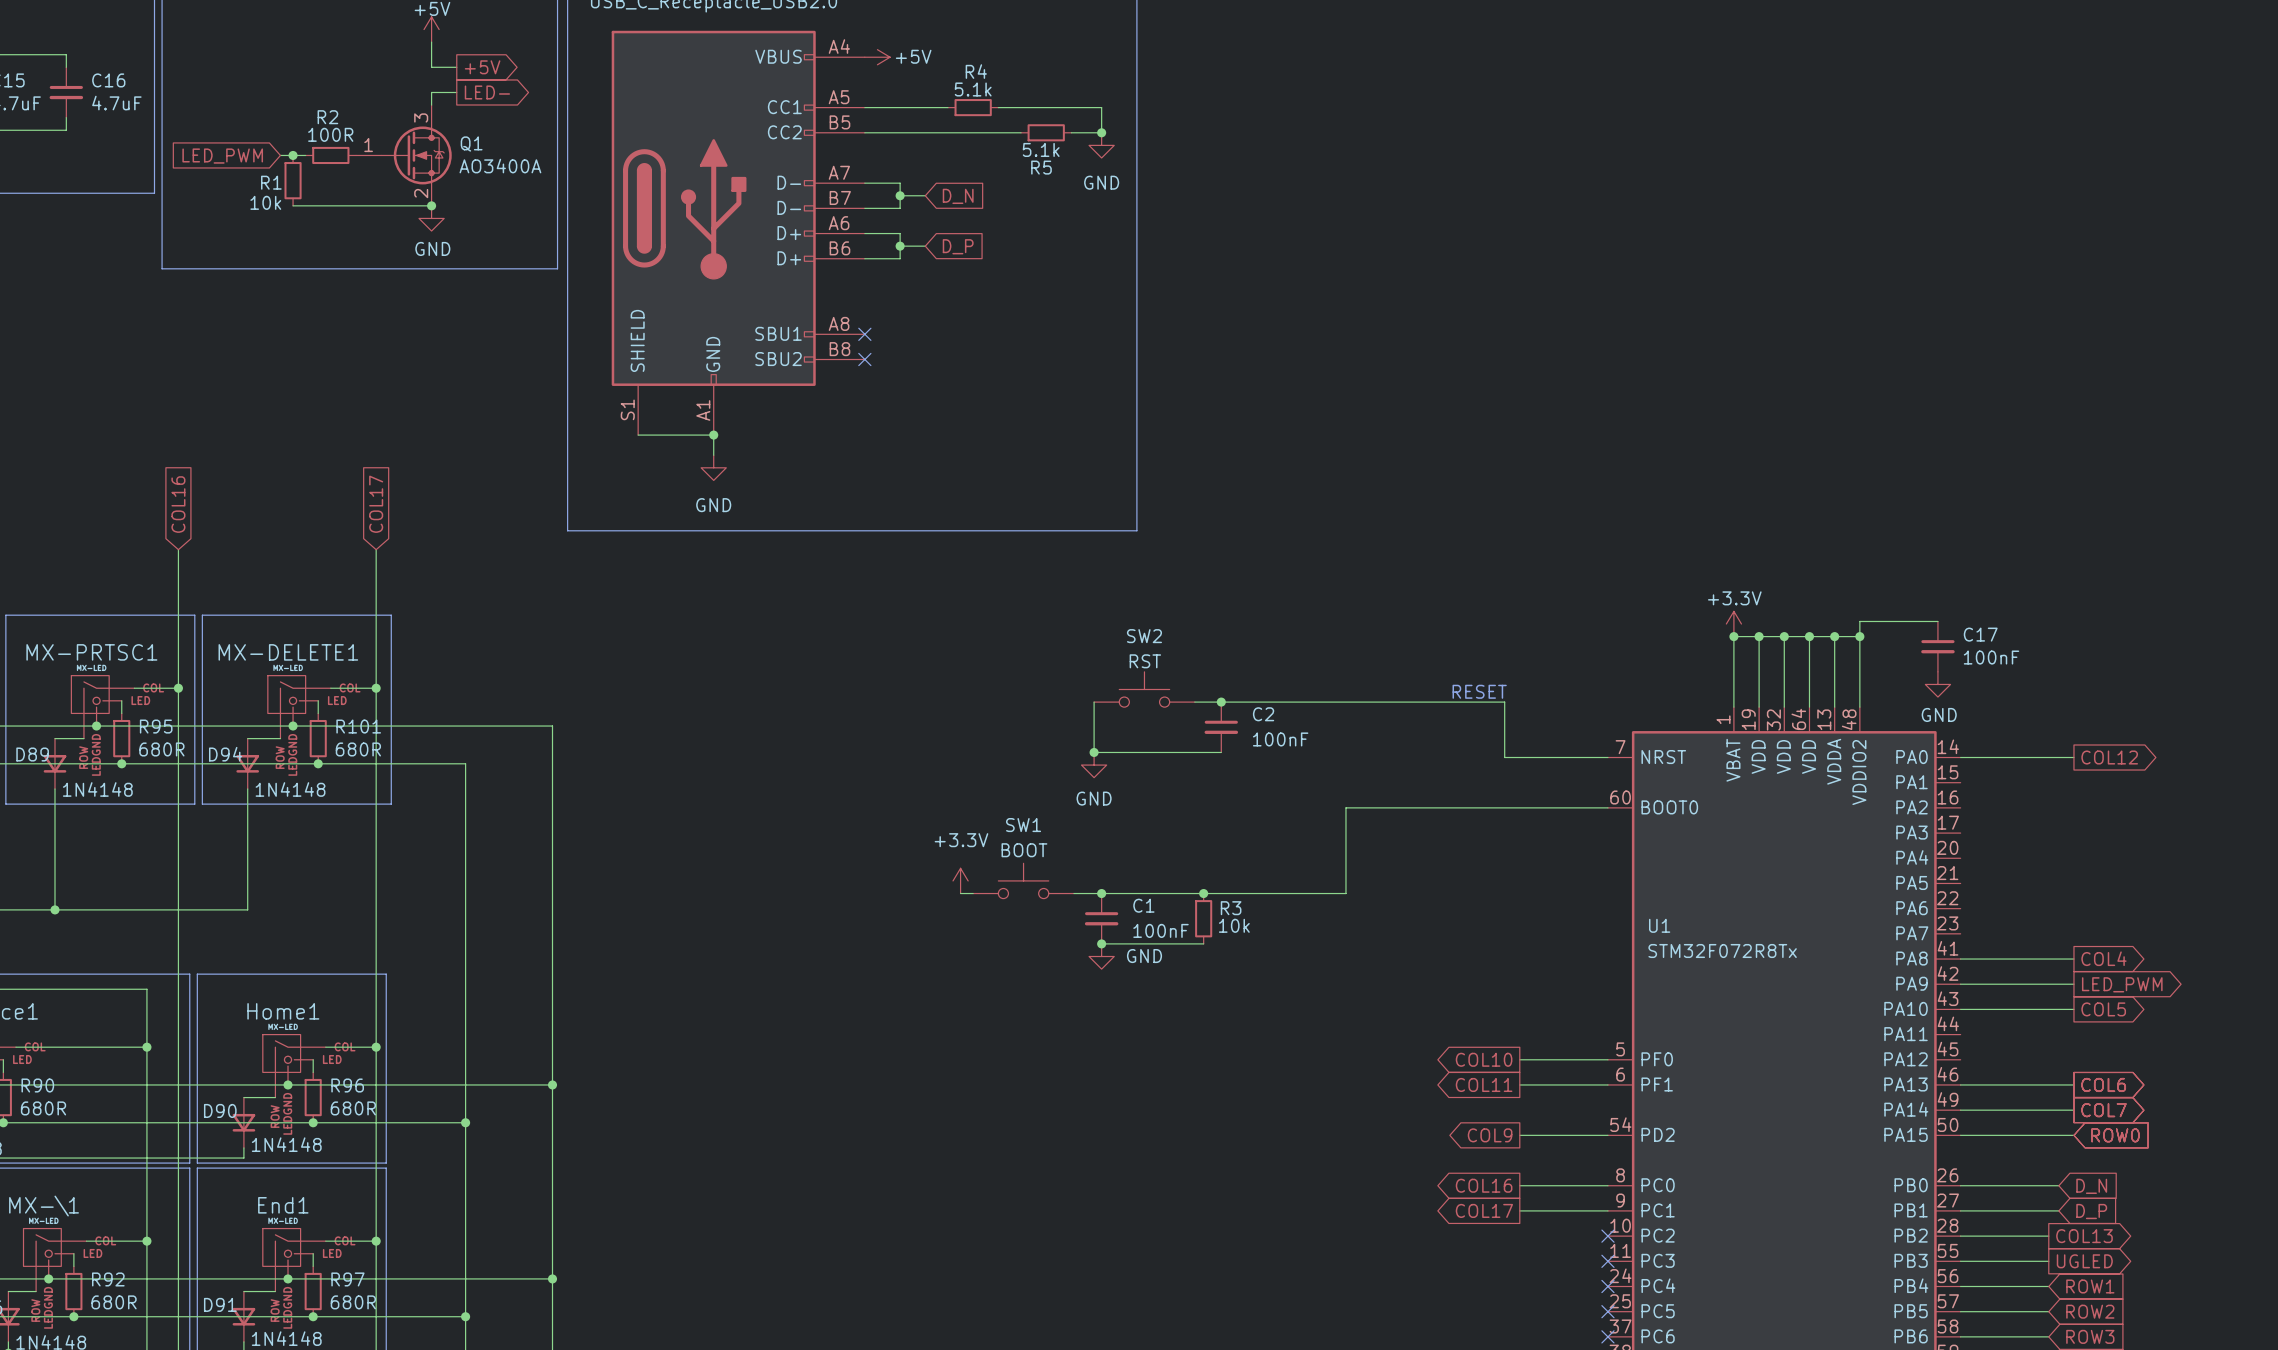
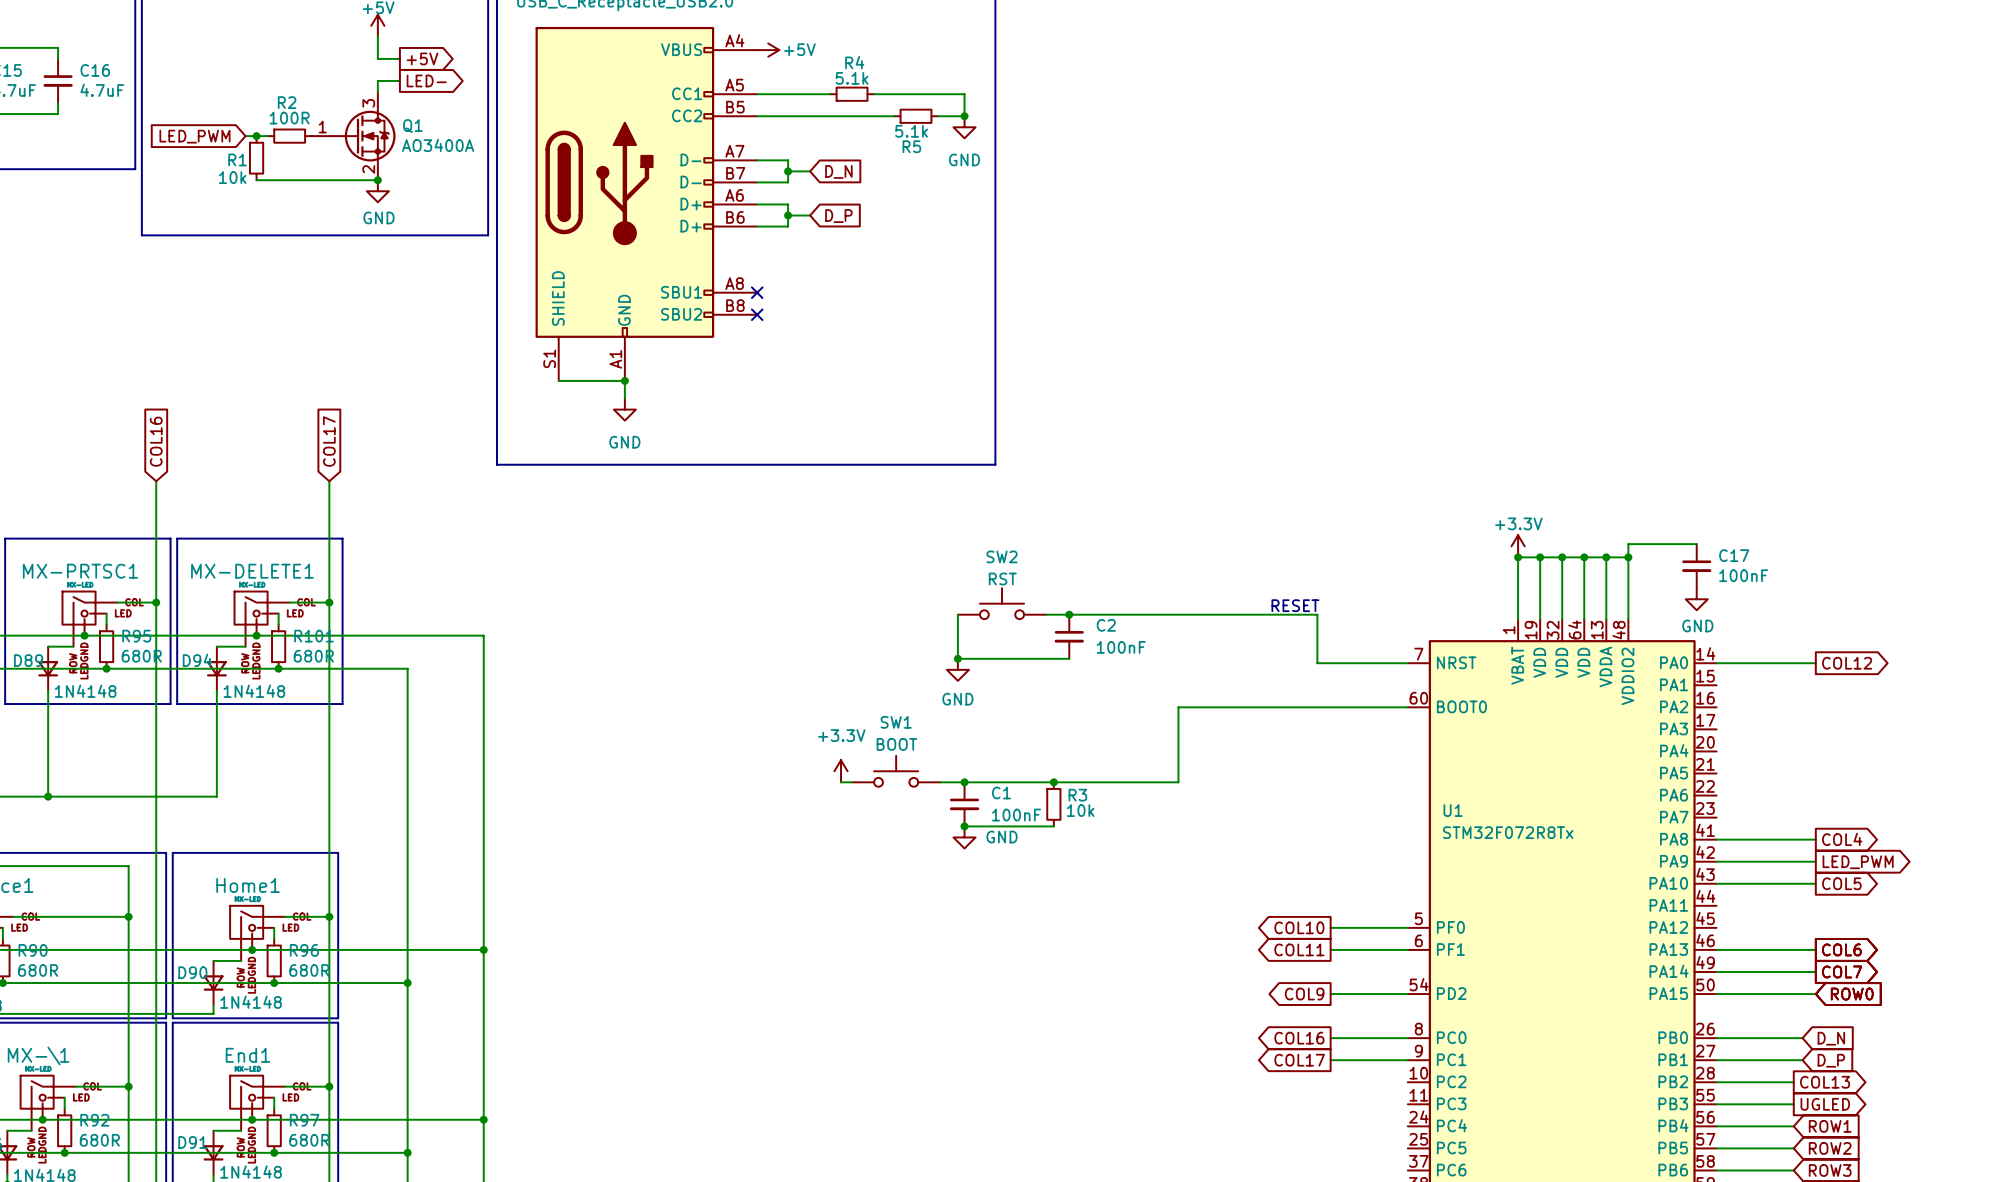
no-connect mark: (1607, 1236) -> none
no-connect mark: (1607, 1261) -> none
no-connect mark: (1607, 1286) -> none
no-connect mark: (1607, 1311) -> none
no-connect mark: (1607, 1336) -> none

